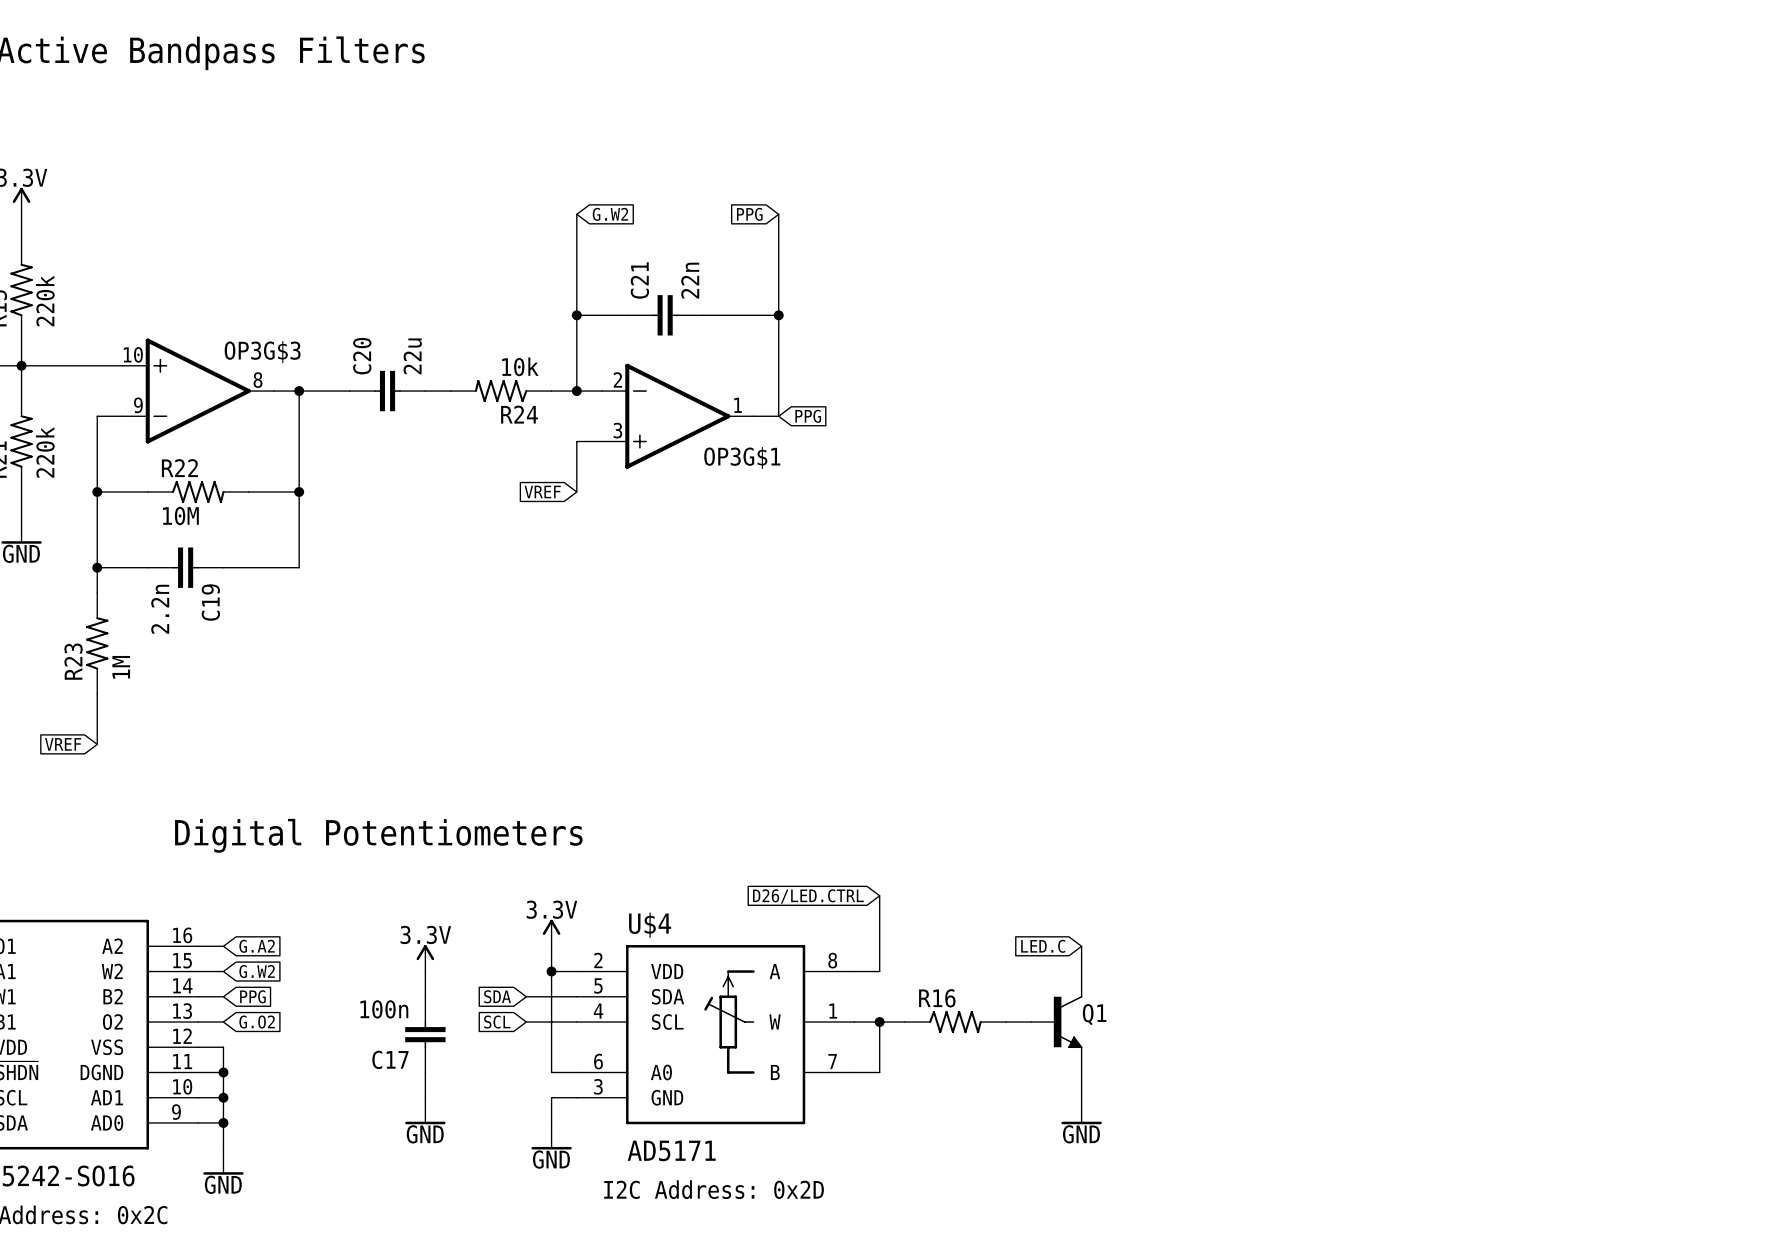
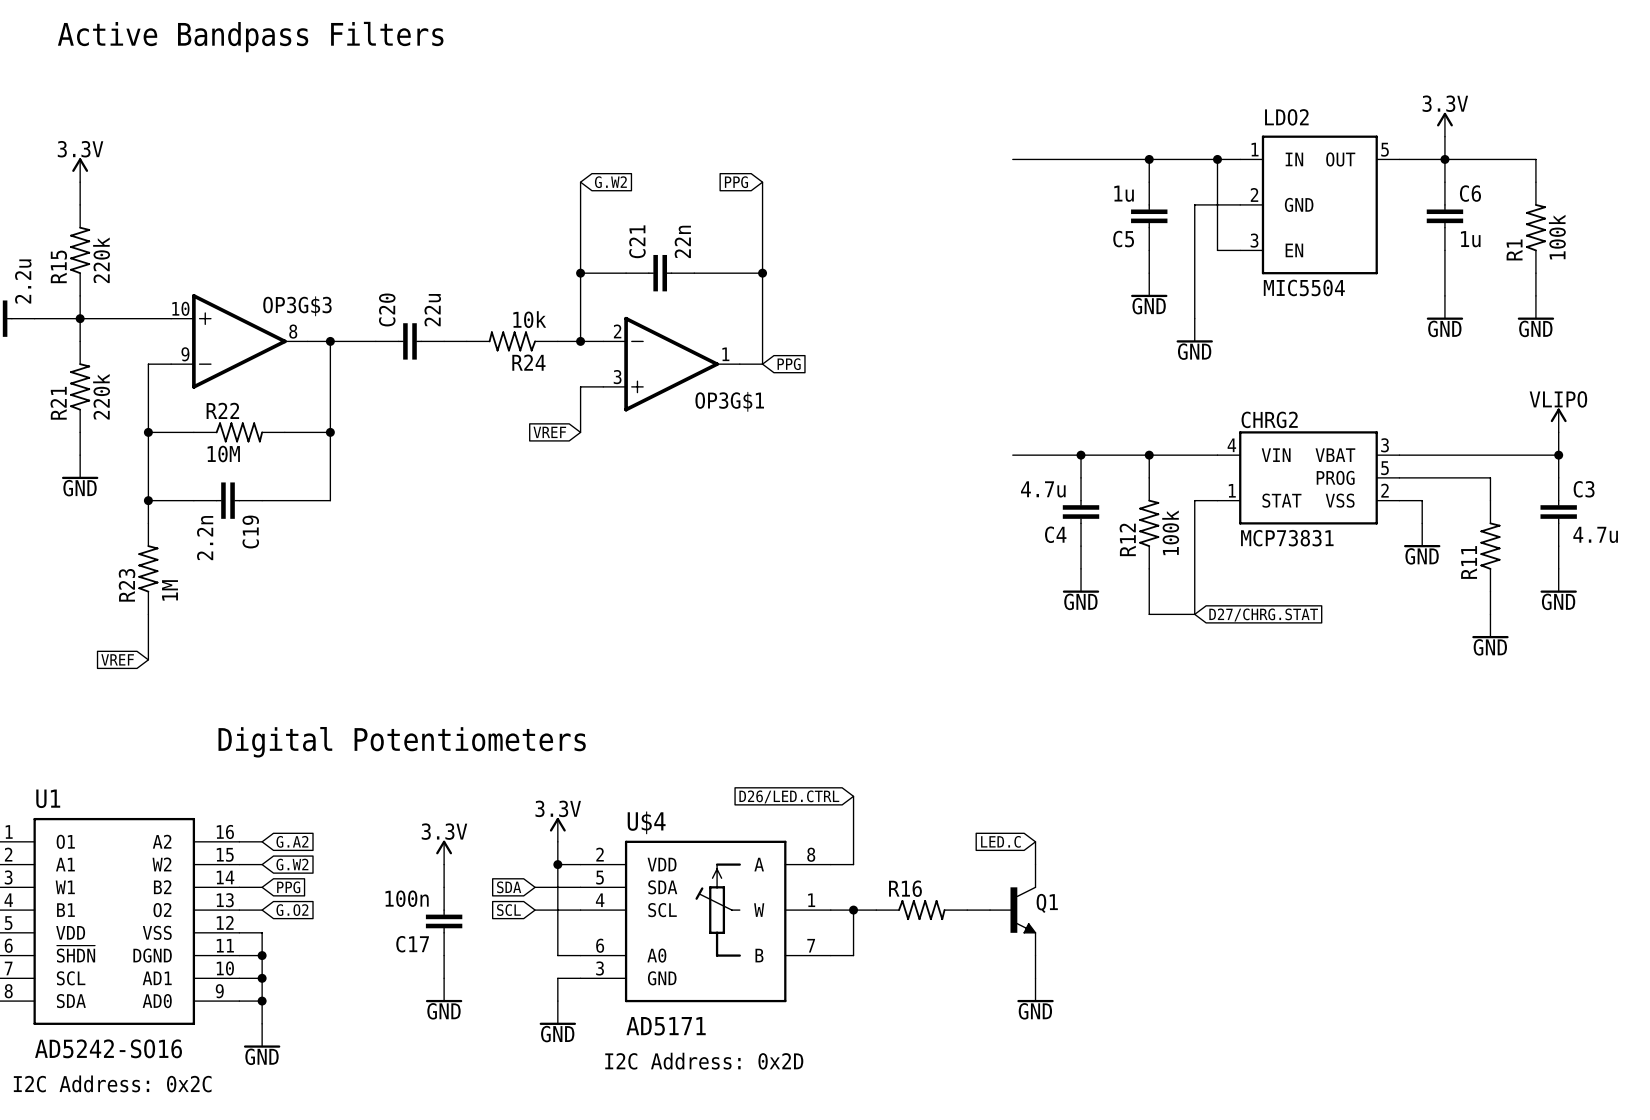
power symbol: none -> 3.3V (1444, 124)
wire: none -> (1444, 136) (1444, 182)
wire: none -> (1012, 159) (1240, 159)
wire: none -> (1149, 159) (1149, 182)
junction: none -> (1149, 159)
wire: none -> (1217, 159) (1217, 250) (1240, 250)
junction: none -> (1217, 159)
wire: none -> (1399, 159) (1535, 159) (1535, 182)
junction: none -> (1444, 159)
wire: none -> (1240, 204) (1194, 204) (1194, 318)
LDO2: none -> MIC5504 (1319, 204)
C5: none -> 1u (1149, 216)
C6: none -> 1u (1444, 216)
R1: none -> 100k (1535, 227)
wire: none -> (1149, 250) (1149, 273)
wire: none -> (1444, 250) (1444, 295)
wire: none -> (1535, 273) (1535, 295)
power symbol: none -> GND (1149, 285)
power symbol: none -> GND (1444, 307)
power symbol: none -> GND (1535, 307)
power symbol: none -> GND (1194, 330)
power symbol: none -> VLIPO (1558, 420)
wire: none -> (1558, 432) (1558, 477)
wire: none -> (1012, 455) (1217, 455)
wire: none -> (1081, 455) (1081, 477)
junction: none -> (1081, 455)
wire: none -> (1149, 455) (1149, 477)
junction: none -> (1149, 455)
wire: none -> (1399, 455) (1558, 455)
junction: none -> (1558, 455)
CHRG2: none -> MCP73831 (1308, 477)
wire: none -> (1399, 477) (1490, 477) (1490, 500)
wire: none -> (1217, 500) (1194, 500) (1194, 614) (1149, 614) (1149, 568)
wire: none -> (1399, 500) (1422, 500) (1422, 523)
C4: none -> 4.7u (1081, 512)
C3: none -> 4.7u (1558, 512)
R12: none -> 100k (1149, 523)
power symbol: none -> GND (1422, 535)
wire: none -> (1081, 546) (1081, 568)
R11: none -> (1490, 546)
wire: none -> (1558, 546) (1558, 568)
power symbol: none -> GND (1081, 580)
power symbol: none -> GND (1558, 580)
wire: none -> (1490, 591) (1490, 614)
global label: none -> D27/CHRG.STAT (1263, 614)
power symbol: none -> GND (1490, 626)

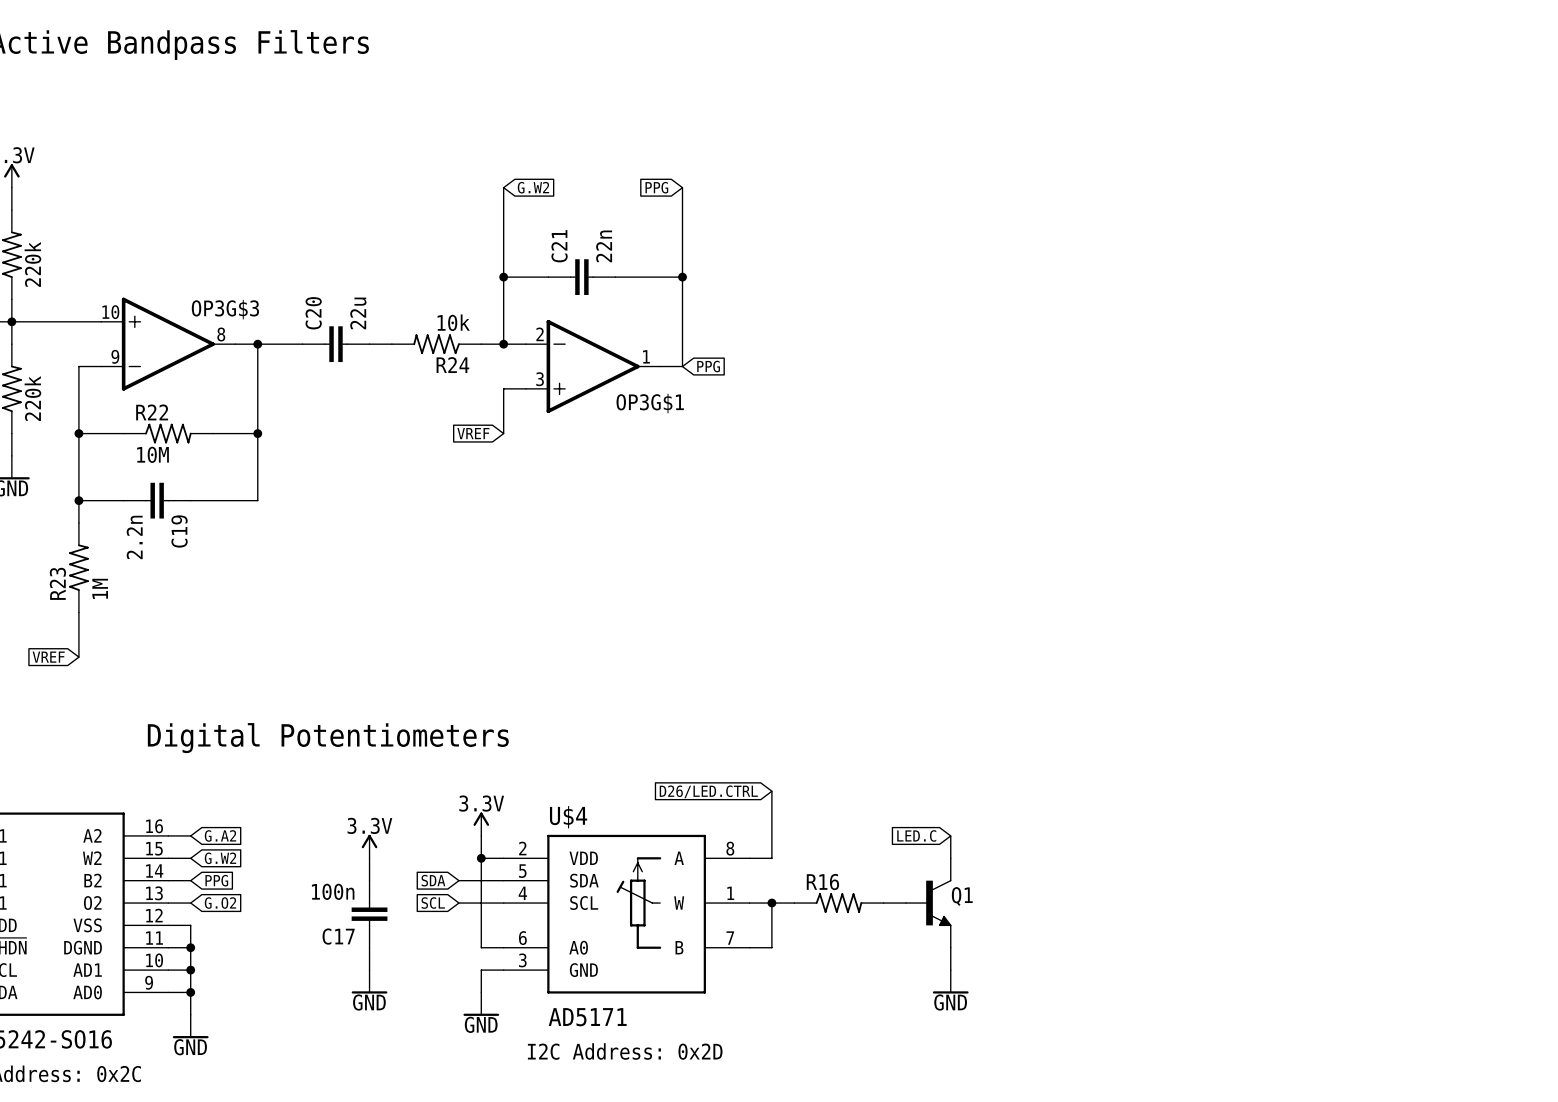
power symbol: 3.3V (1444, 124) -> none
wire: (1444, 136) (1444, 182) -> none
wire: (1012, 159) (1240, 159) -> none
wire: (1149, 159) (1149, 182) -> none
junction: (1149, 159) -> none
wire: (1217, 159) (1217, 250) (1240, 250) -> none
junction: (1217, 159) -> none
wire: (1399, 159) (1535, 159) (1535, 182) -> none
junction: (1444, 159) -> none
wire: (1240, 204) (1194, 204) (1194, 318) -> none
LDO2: MIC5504 (1319, 204) -> none
C5: 1u (1149, 216) -> none
C6: 1u (1444, 216) -> none
R1: 100k (1535, 227) -> none
wire: (1149, 250) (1149, 273) -> none
wire: (1444, 250) (1444, 295) -> none
wire: (1535, 273) (1535, 295) -> none
power symbol: GND (1149, 285) -> none
power symbol: GND (1444, 307) -> none
power symbol: GND (1535, 307) -> none
power symbol: GND (1194, 330) -> none
power symbol: VLIPO (1558, 420) -> none
wire: (1558, 432) (1558, 477) -> none
wire: (1012, 455) (1217, 455) -> none
wire: (1081, 455) (1081, 477) -> none
junction: (1081, 455) -> none
wire: (1149, 455) (1149, 477) -> none
junction: (1149, 455) -> none
wire: (1399, 455) (1558, 455) -> none
junction: (1558, 455) -> none
CHRG2: MCP73831 (1308, 477) -> none
wire: (1399, 477) (1490, 477) (1490, 500) -> none
wire: (1217, 500) (1194, 500) (1194, 614) (1149, 614) (1149, 568) -> none
wire: (1399, 500) (1422, 500) (1422, 523) -> none
C4: 4.7u (1081, 512) -> none
C3: 4.7u (1558, 512) -> none
R12: 100k (1149, 523) -> none
power symbol: GND (1422, 535) -> none
wire: (1081, 546) (1081, 568) -> none
R11: (1490, 546) -> none
wire: (1558, 546) (1558, 568) -> none
power symbol: GND (1081, 580) -> none
power symbol: GND (1558, 580) -> none
wire: (1490, 591) (1490, 614) -> none
global label: D27/CHRG.STAT (1263, 614) -> none
power symbol: GND (1490, 626) -> none

